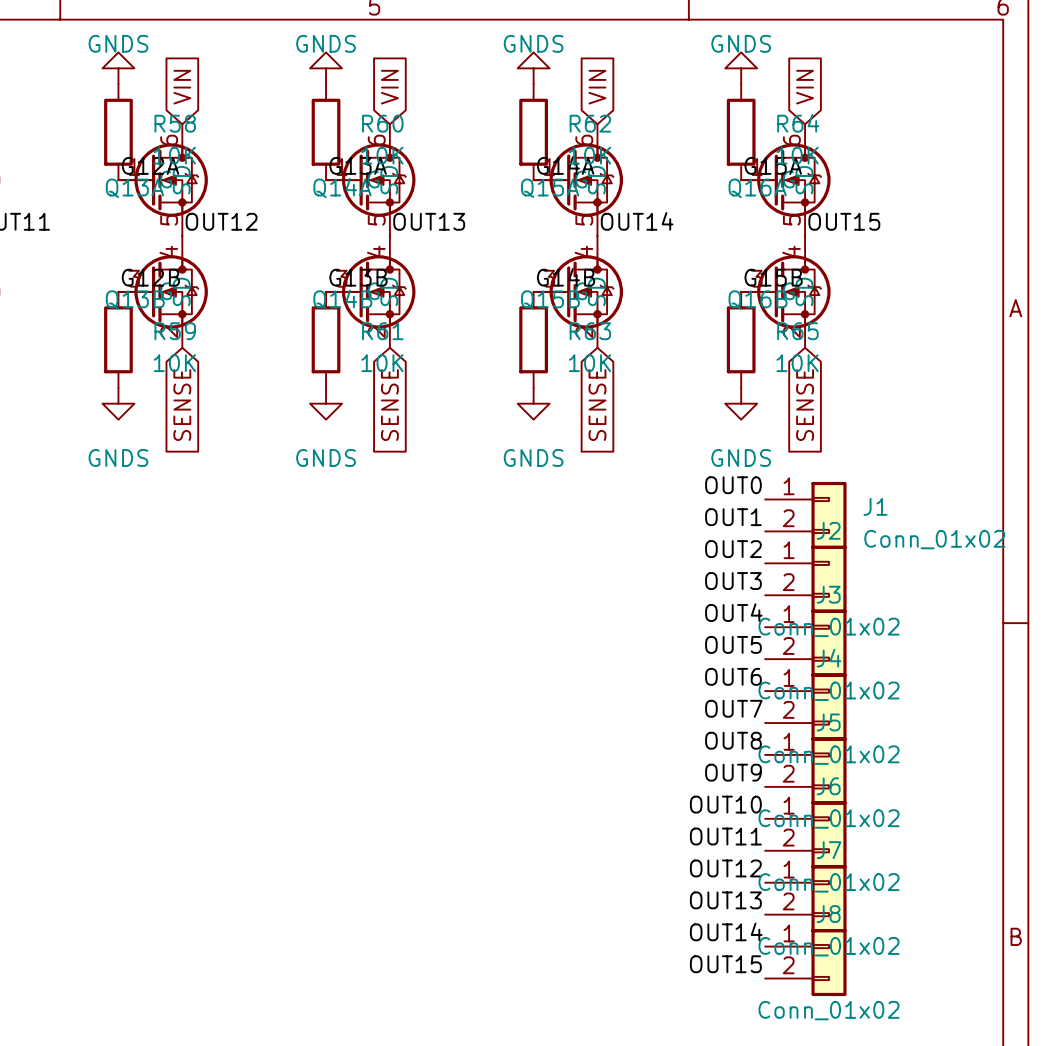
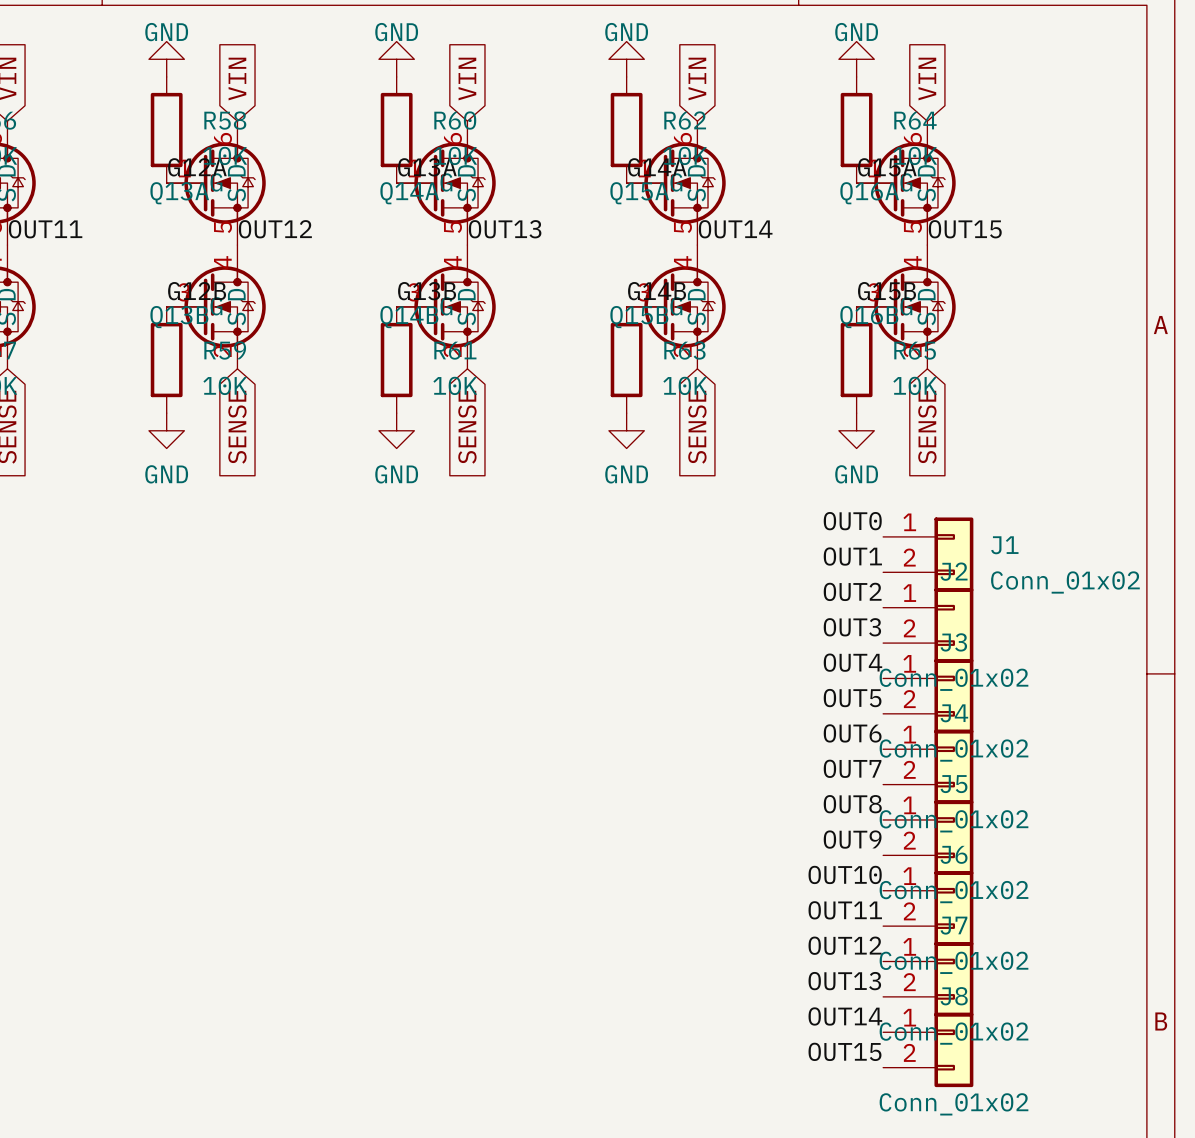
power symbol: GNDS (118, 68) -> GND (166, 59)
power symbol: GNDS (326, 68) -> GND (396, 59)
power symbol: GNDS (533, 68) -> GND (626, 59)
power symbol: GNDS (741, 68) -> GND (856, 59)
power symbol: GNDS (118, 403) -> GND (166, 430)
power symbol: GNDS (326, 403) -> GND (396, 430)
power symbol: GNDS (533, 403) -> GND (626, 430)
power symbol: GNDS (741, 403) -> GND (856, 430)

